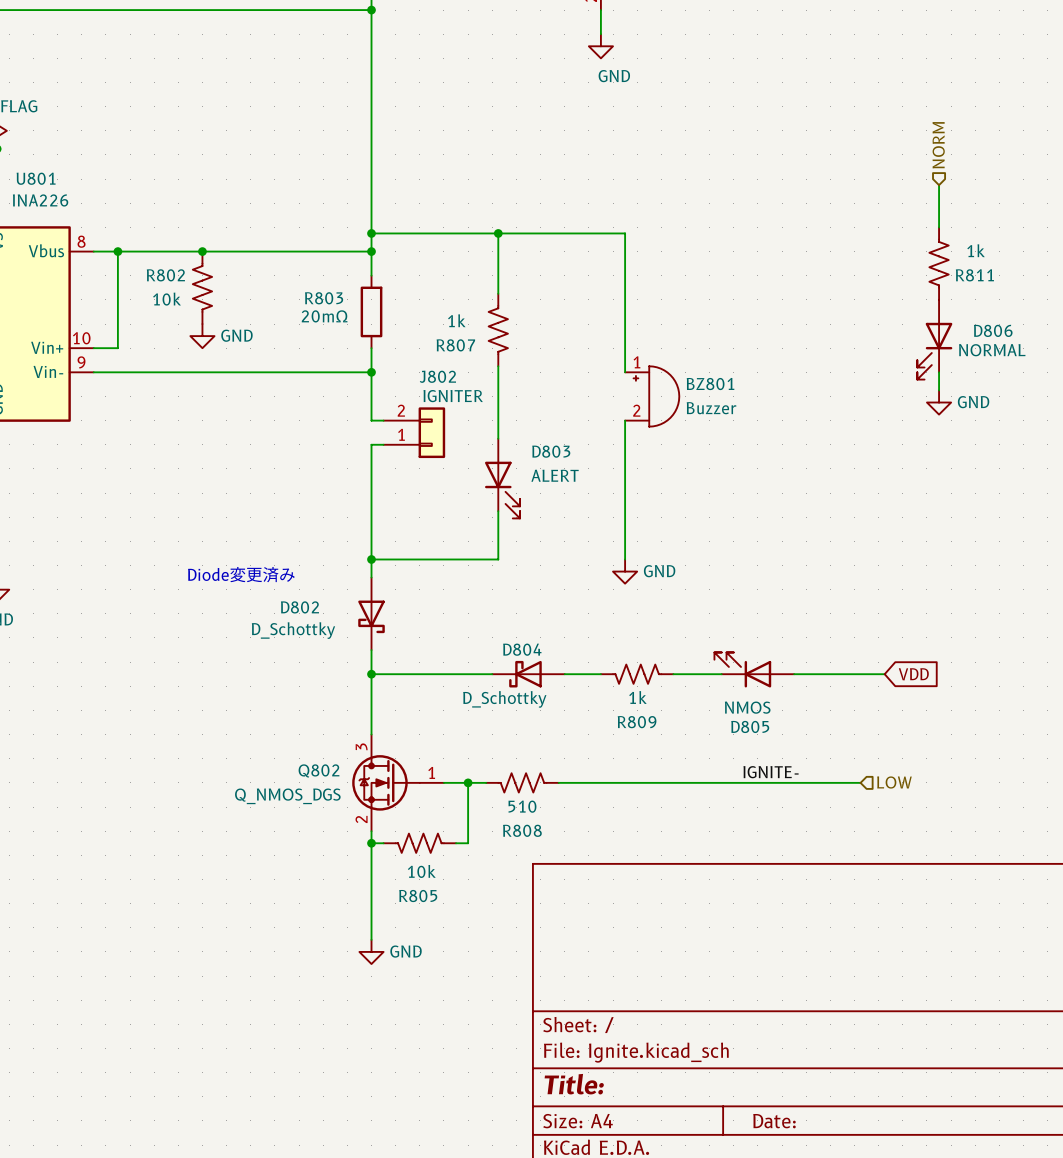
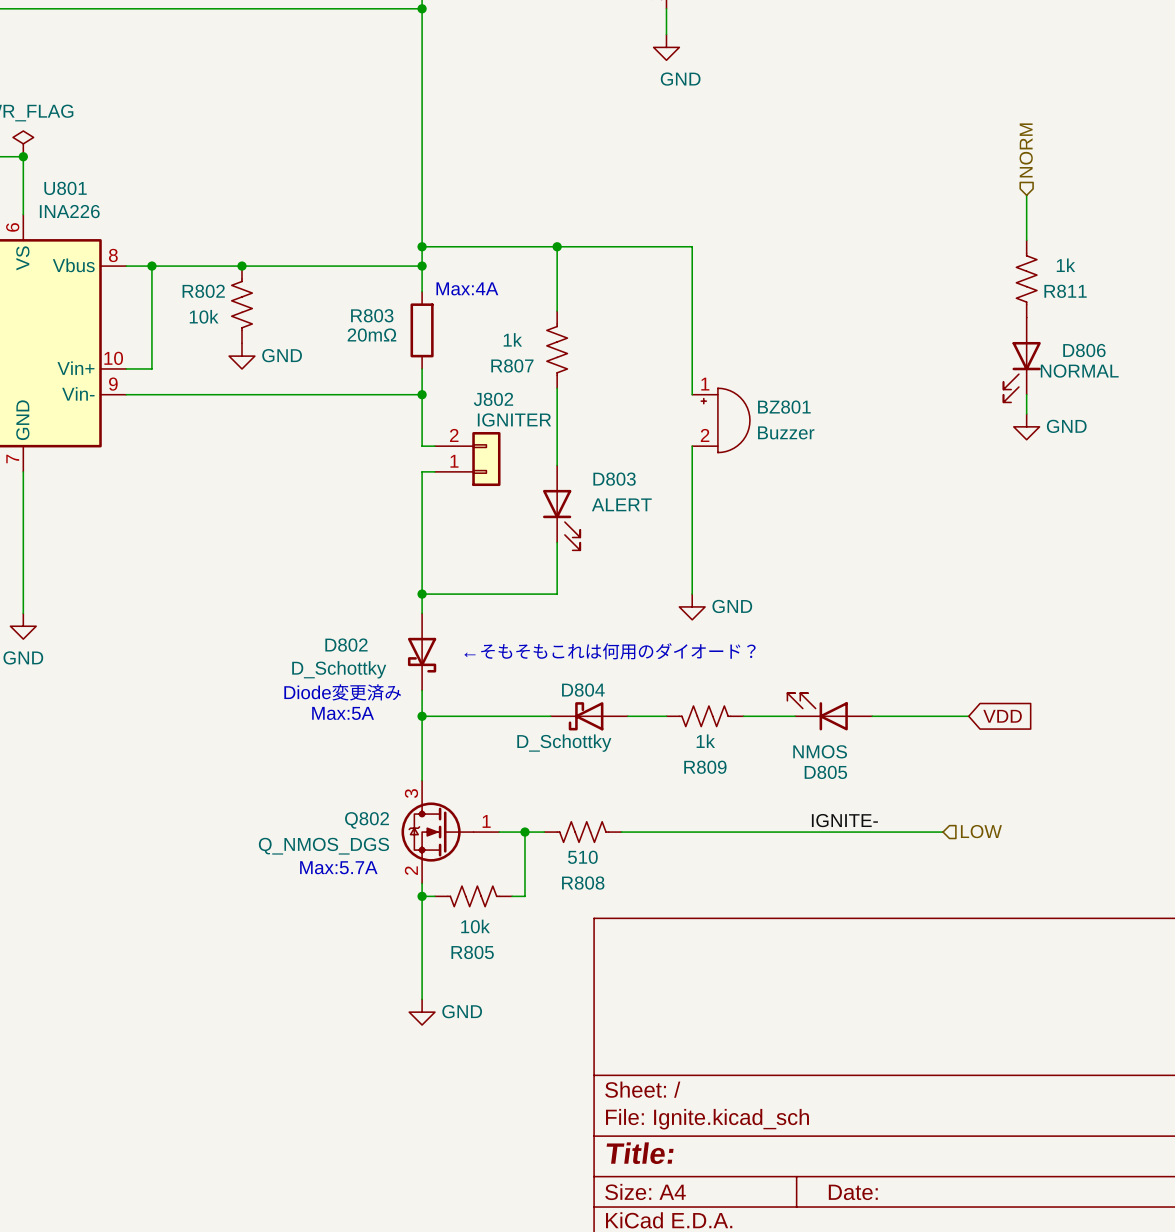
text: none -> Max:4A (467, 288)
text position: Diode変更済み (241, 574) -> Diode変更済み (342, 692)
text: none -> ←そもそもこれは何用のダイオード？ (610, 651)
text: none -> Max:5A (343, 713)
text: none -> Max:5.7A (338, 867)

